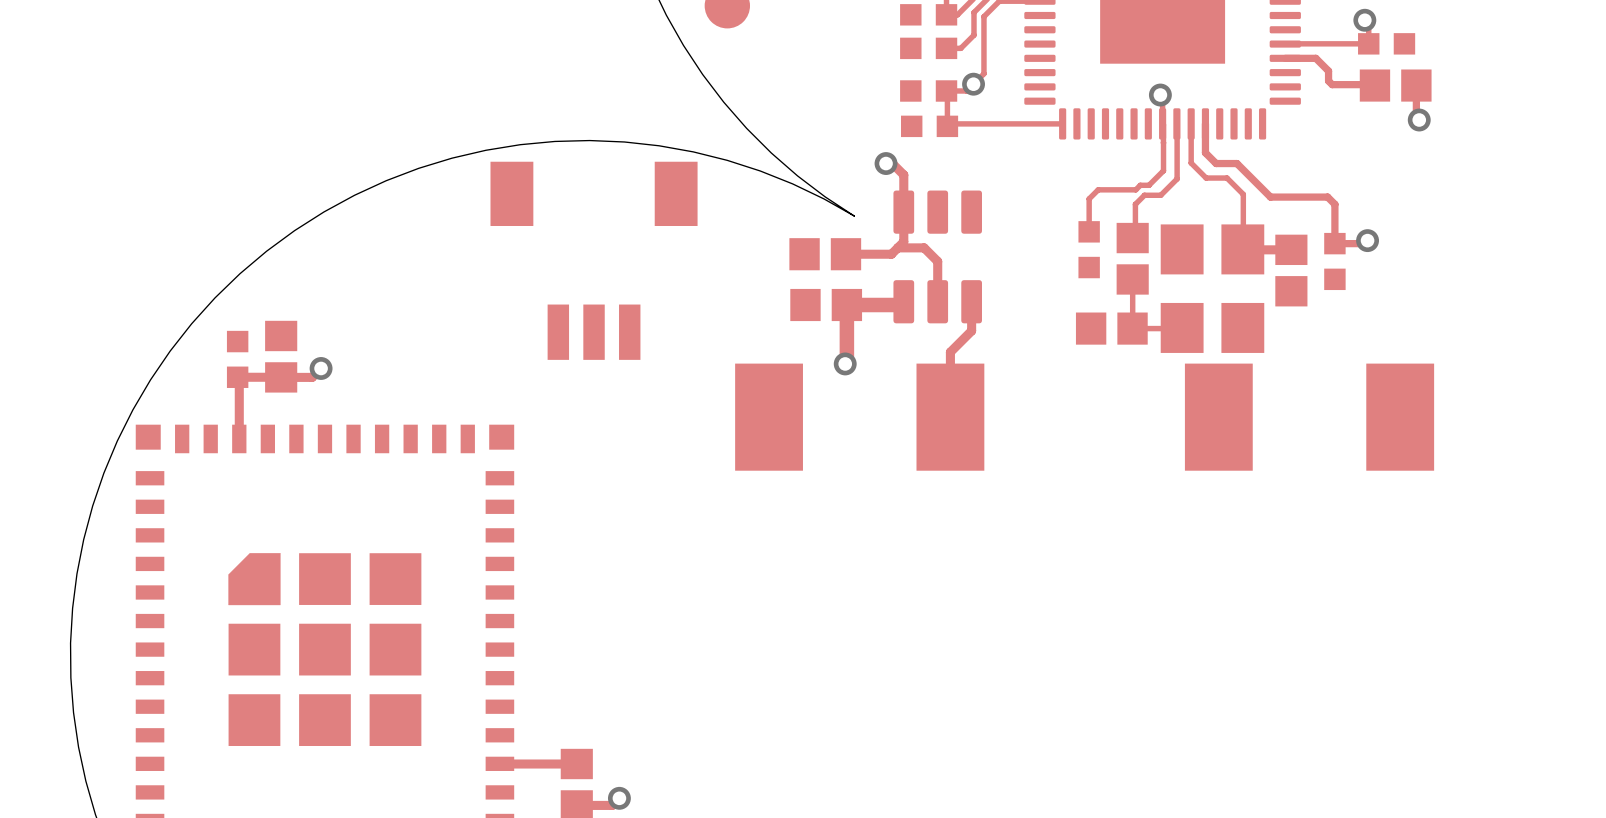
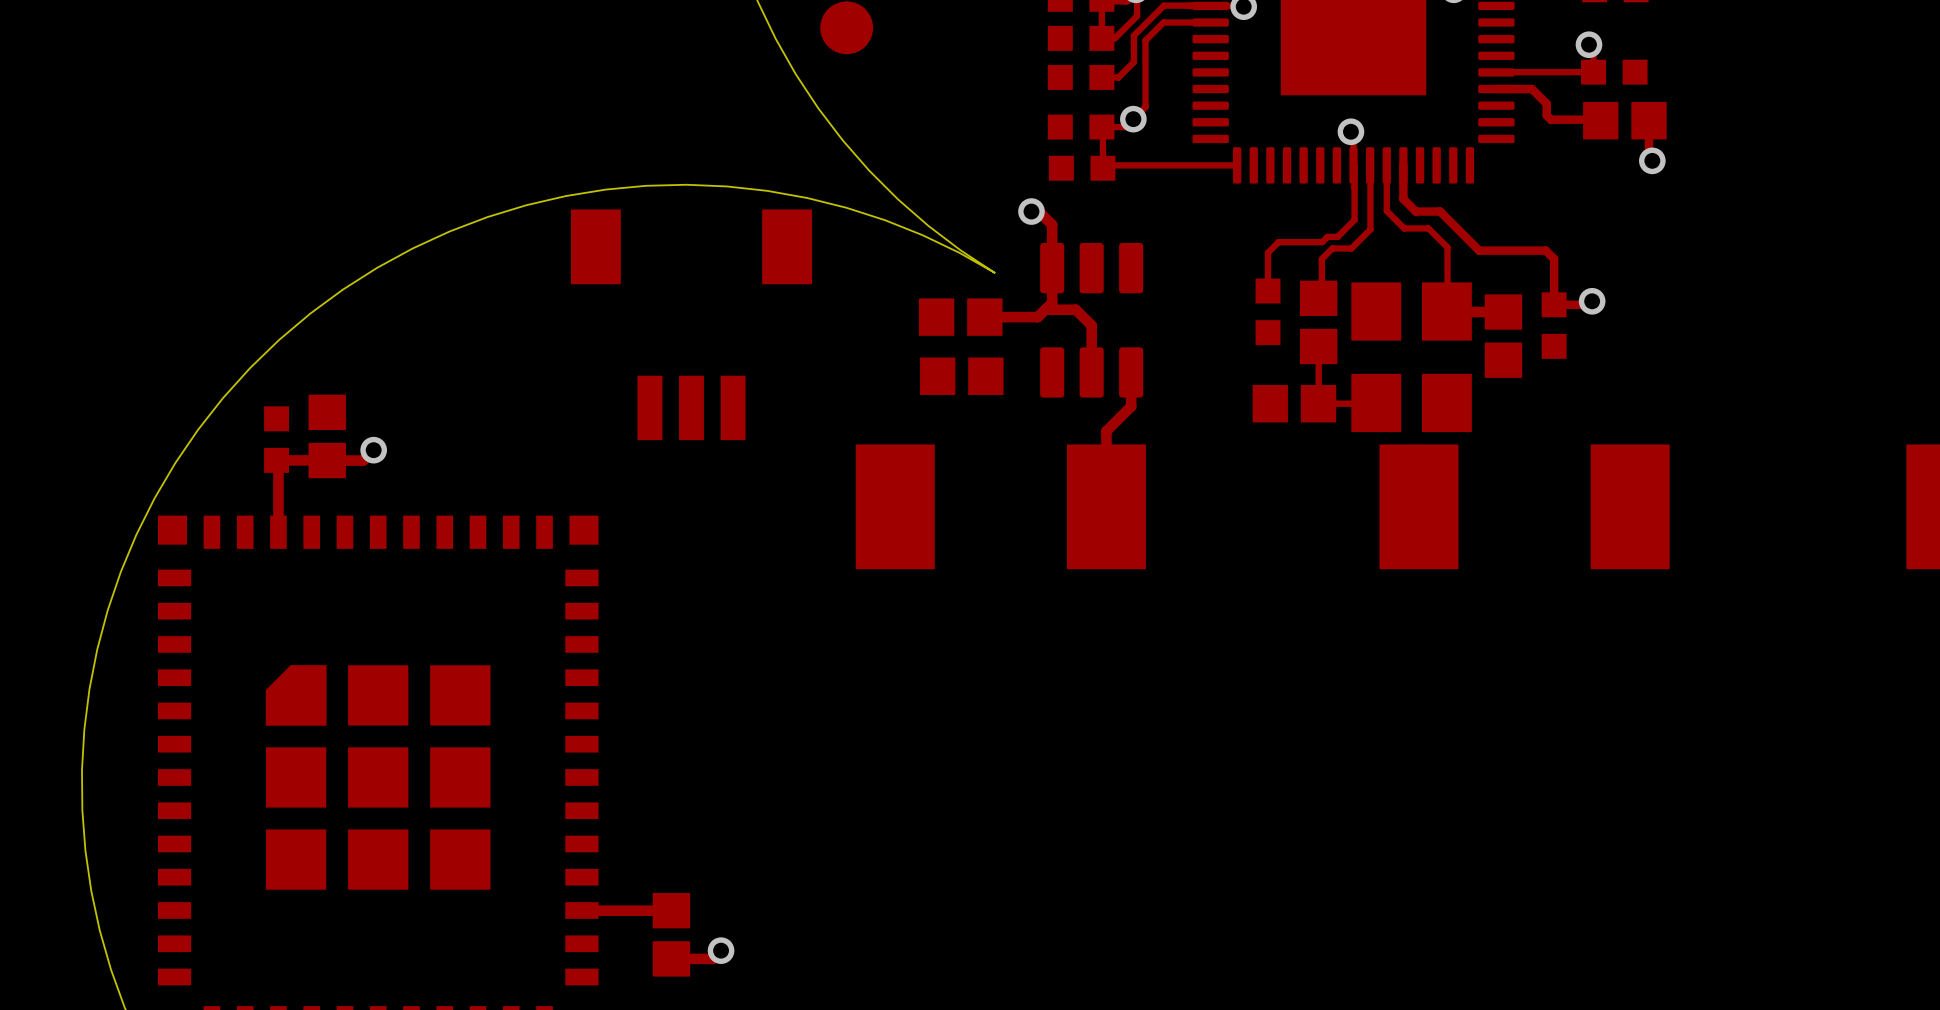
top track: (903, 301) (900, 305) (846, 305) (846, 362) (845, 363) -> none
via: (845, 363) -> none

